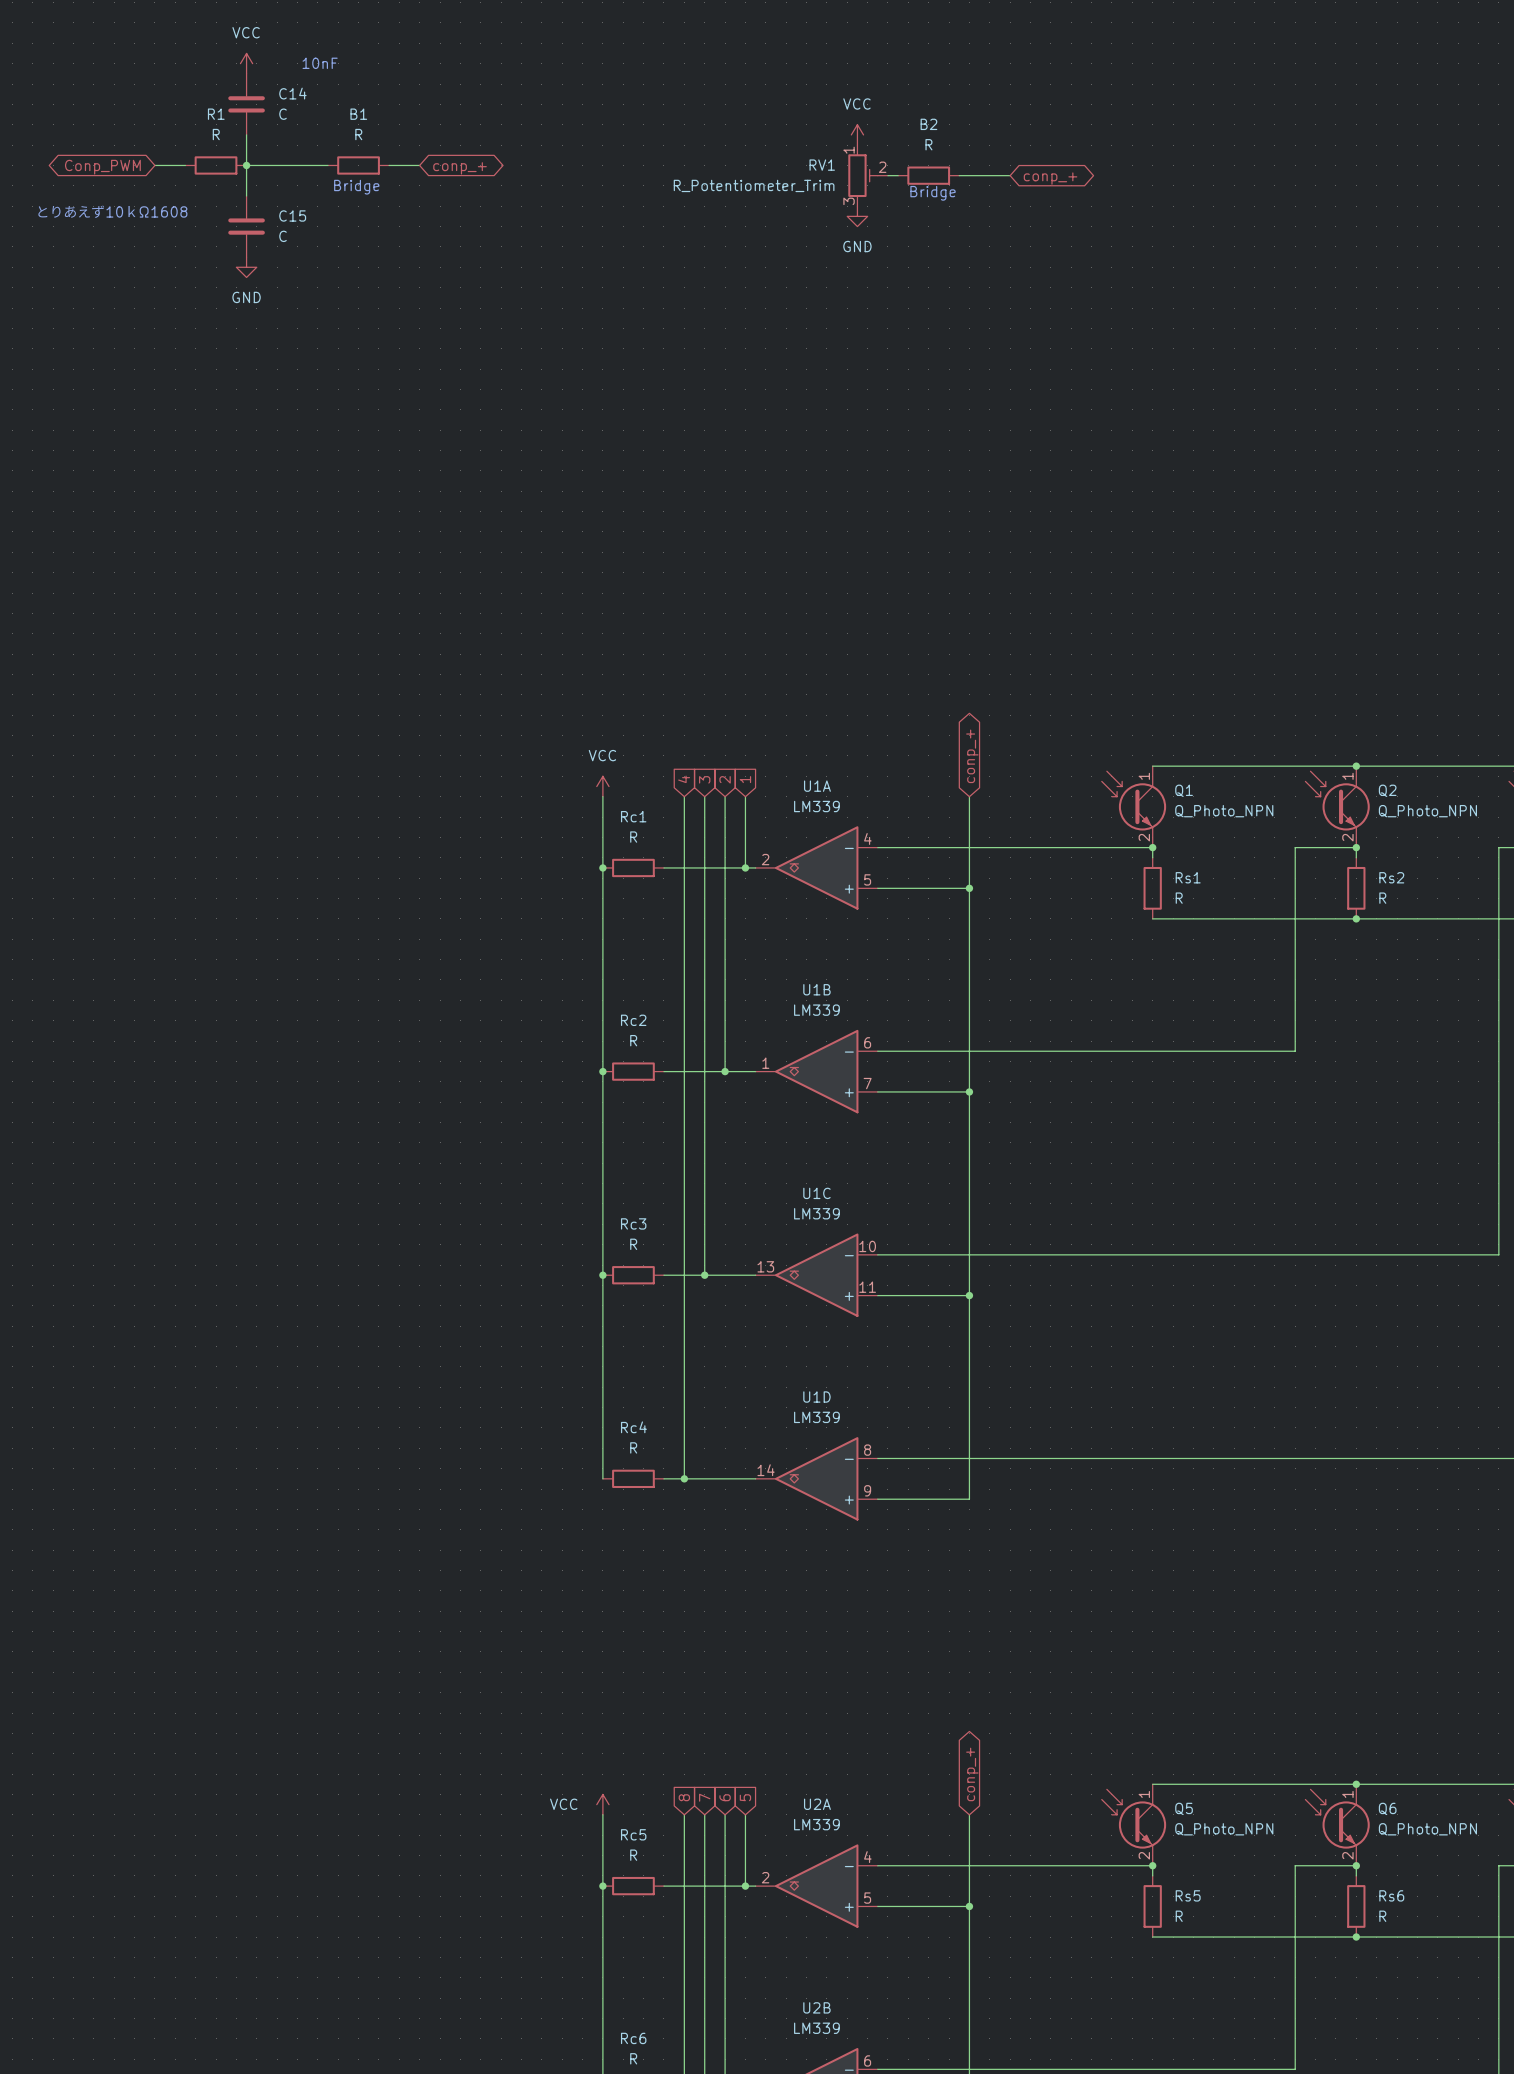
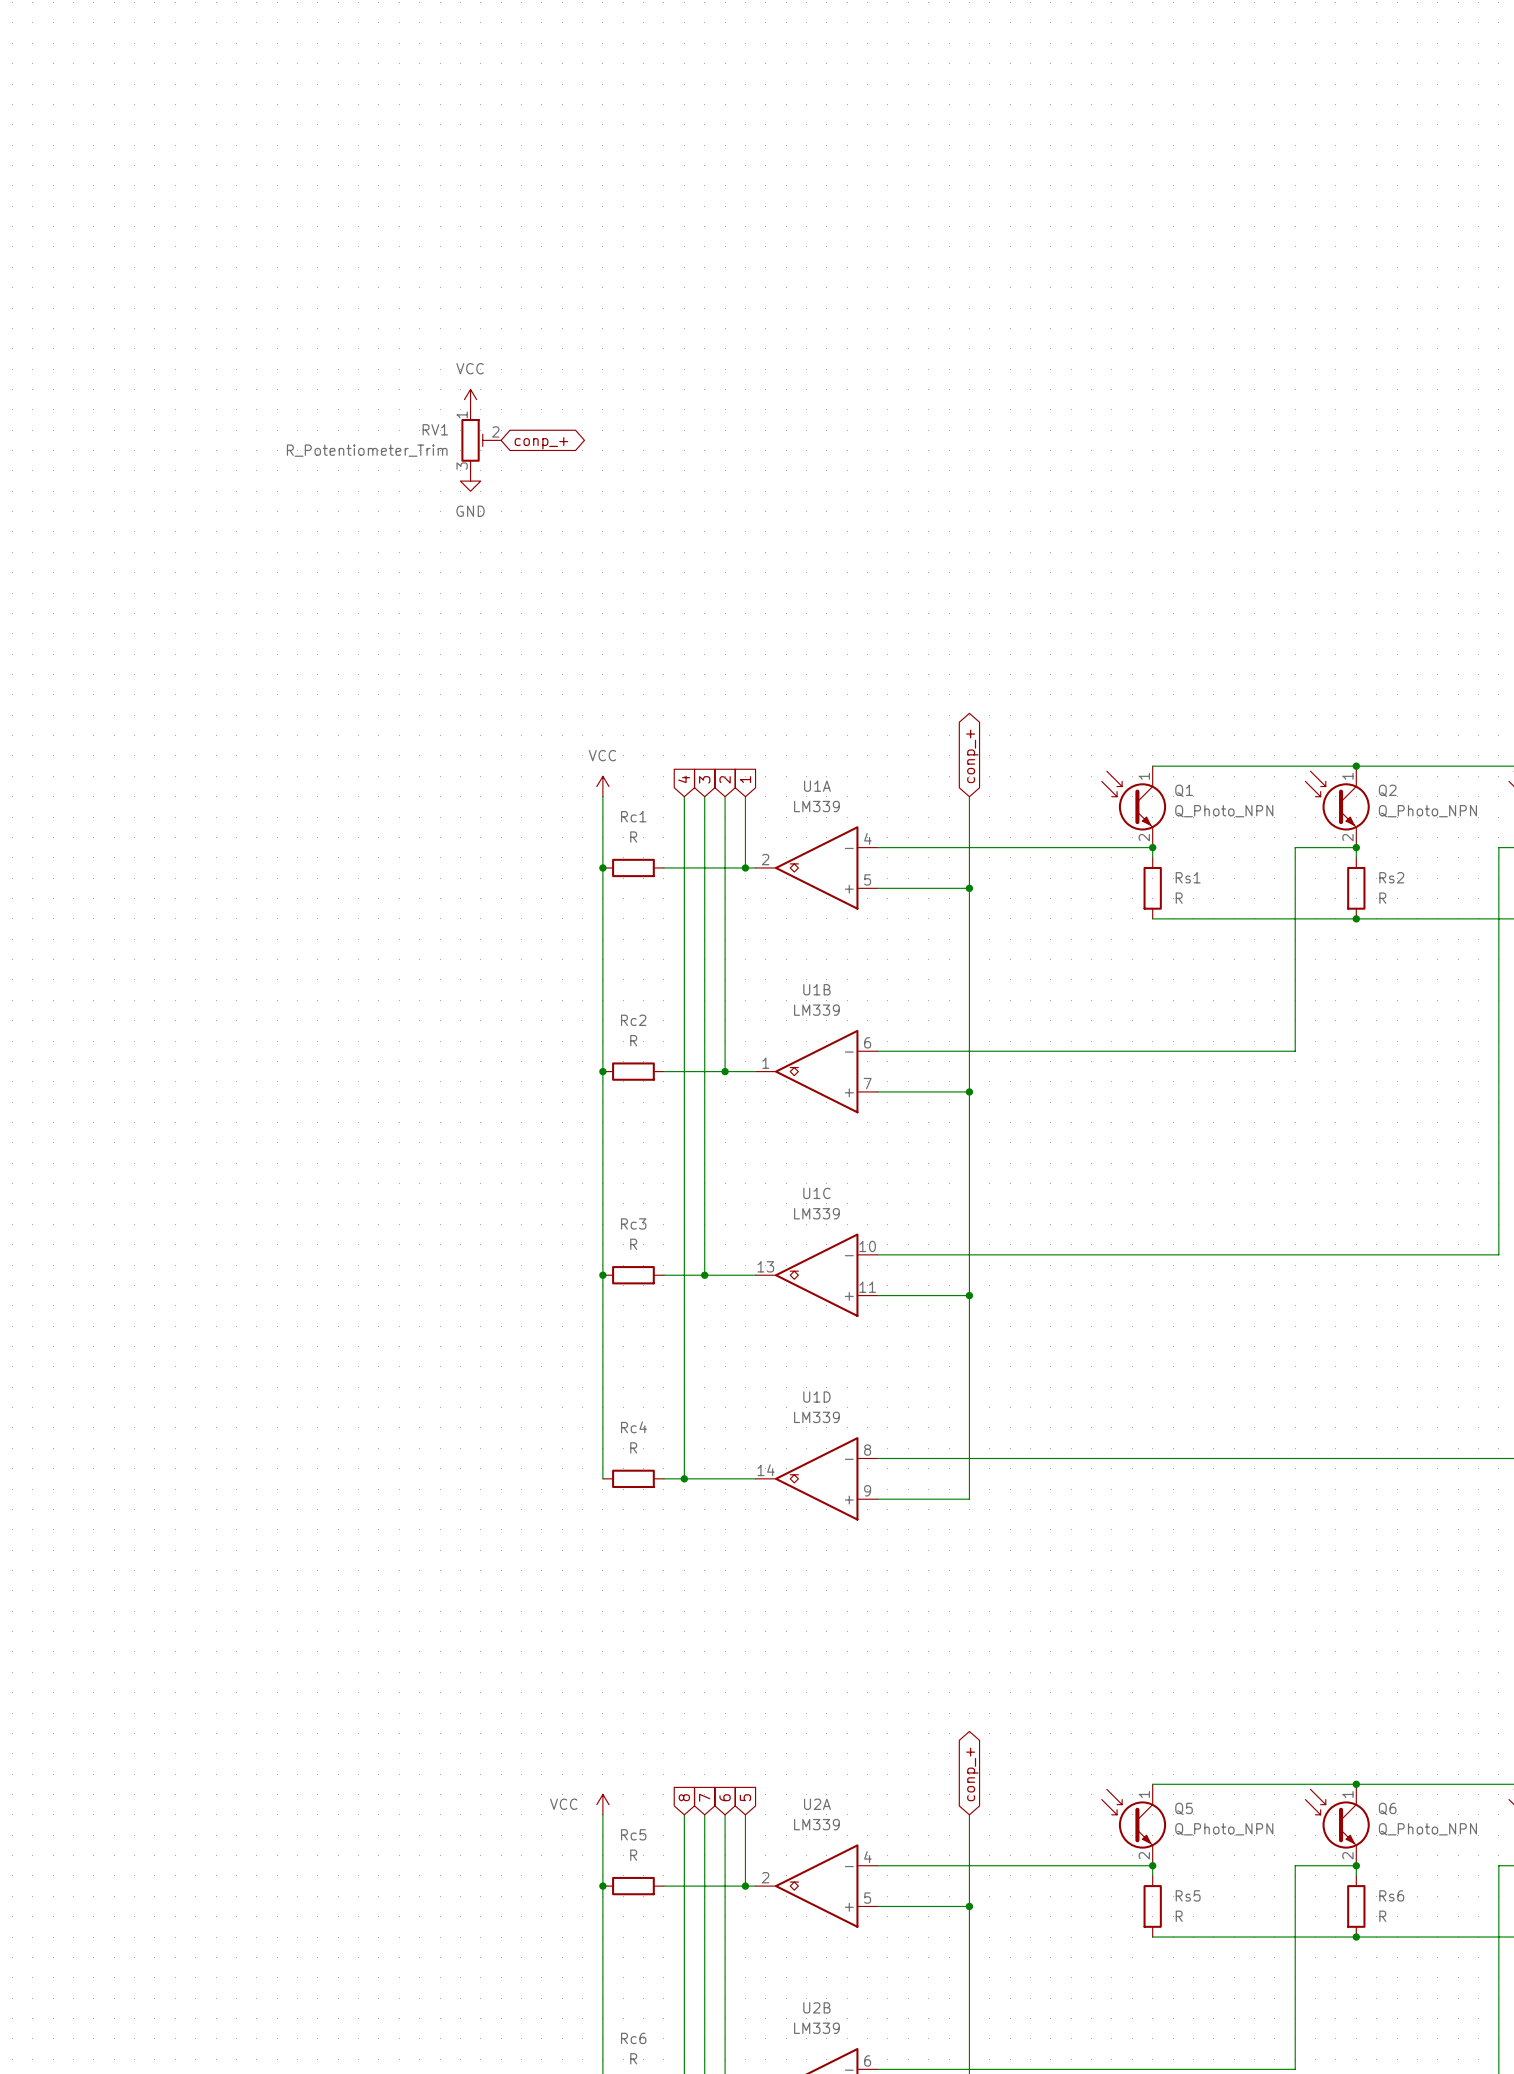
power symbol: VCC (246, 63) -> none
text: 10nF (320, 63) -> none
C14: C (246, 104) -> none
wire: (246, 134) (246, 196) -> none
power symbol: VCC (857, 134) -> none
wire: (154, 165) (185, 165) -> none
R1: R (216, 165) -> none
wire: (246, 165) (328, 165) -> none
junction: (246, 165) -> none
B1: R (358, 165) -> none
wire: (389, 165) (419, 165) -> none
global label: Conp_PWM (102, 167) -> none
global label: conp_+ (460, 168) -> none
RV1 position: (868, 175) -> (481, 440)
wire: (887, 175) (898, 175) -> none
B2: R (928, 175) -> none
wire: (959, 175) (1010, 175) -> none
global label: conp_+ (1050, 178) -> none
text: Bridge (356, 187) -> none
text: Bridge (933, 193) -> none
text: とりあえず10ｋΩ1608 (112, 211) -> none
power symbol: GND (857, 216) -> none
C15: C (246, 226) -> none
power symbol: GND (246, 267) -> none
power symbol: none -> VCC (470, 399)
global label: none -> conp_+ (541, 443)
power symbol: none -> GND (470, 481)

